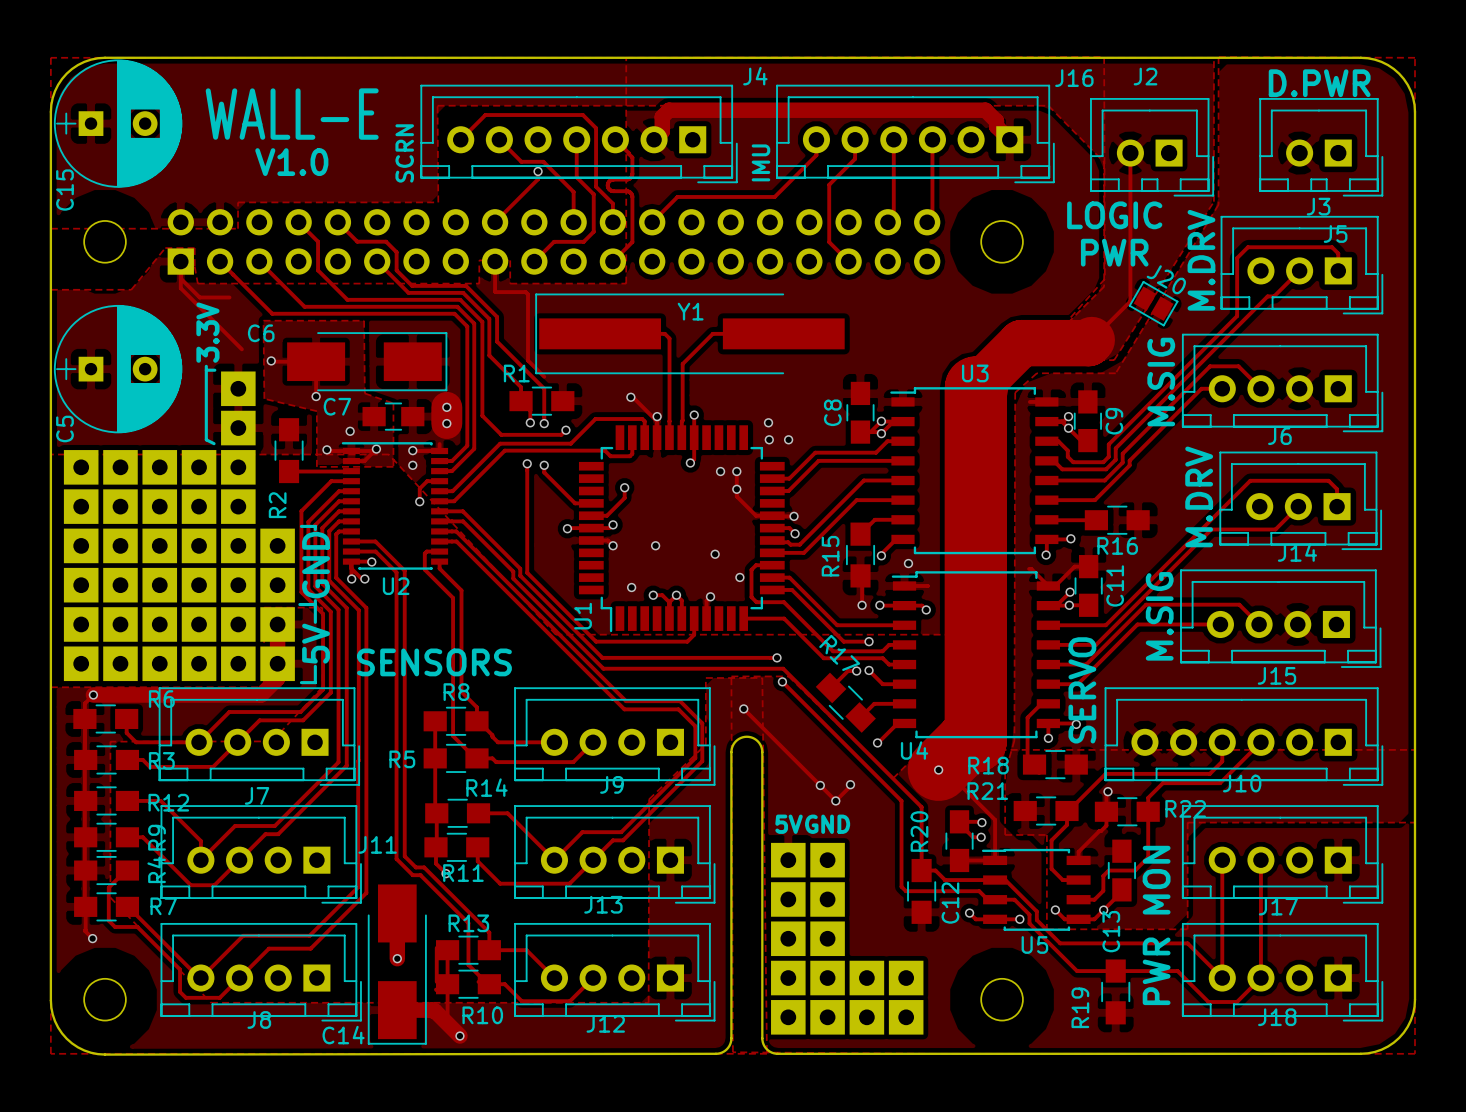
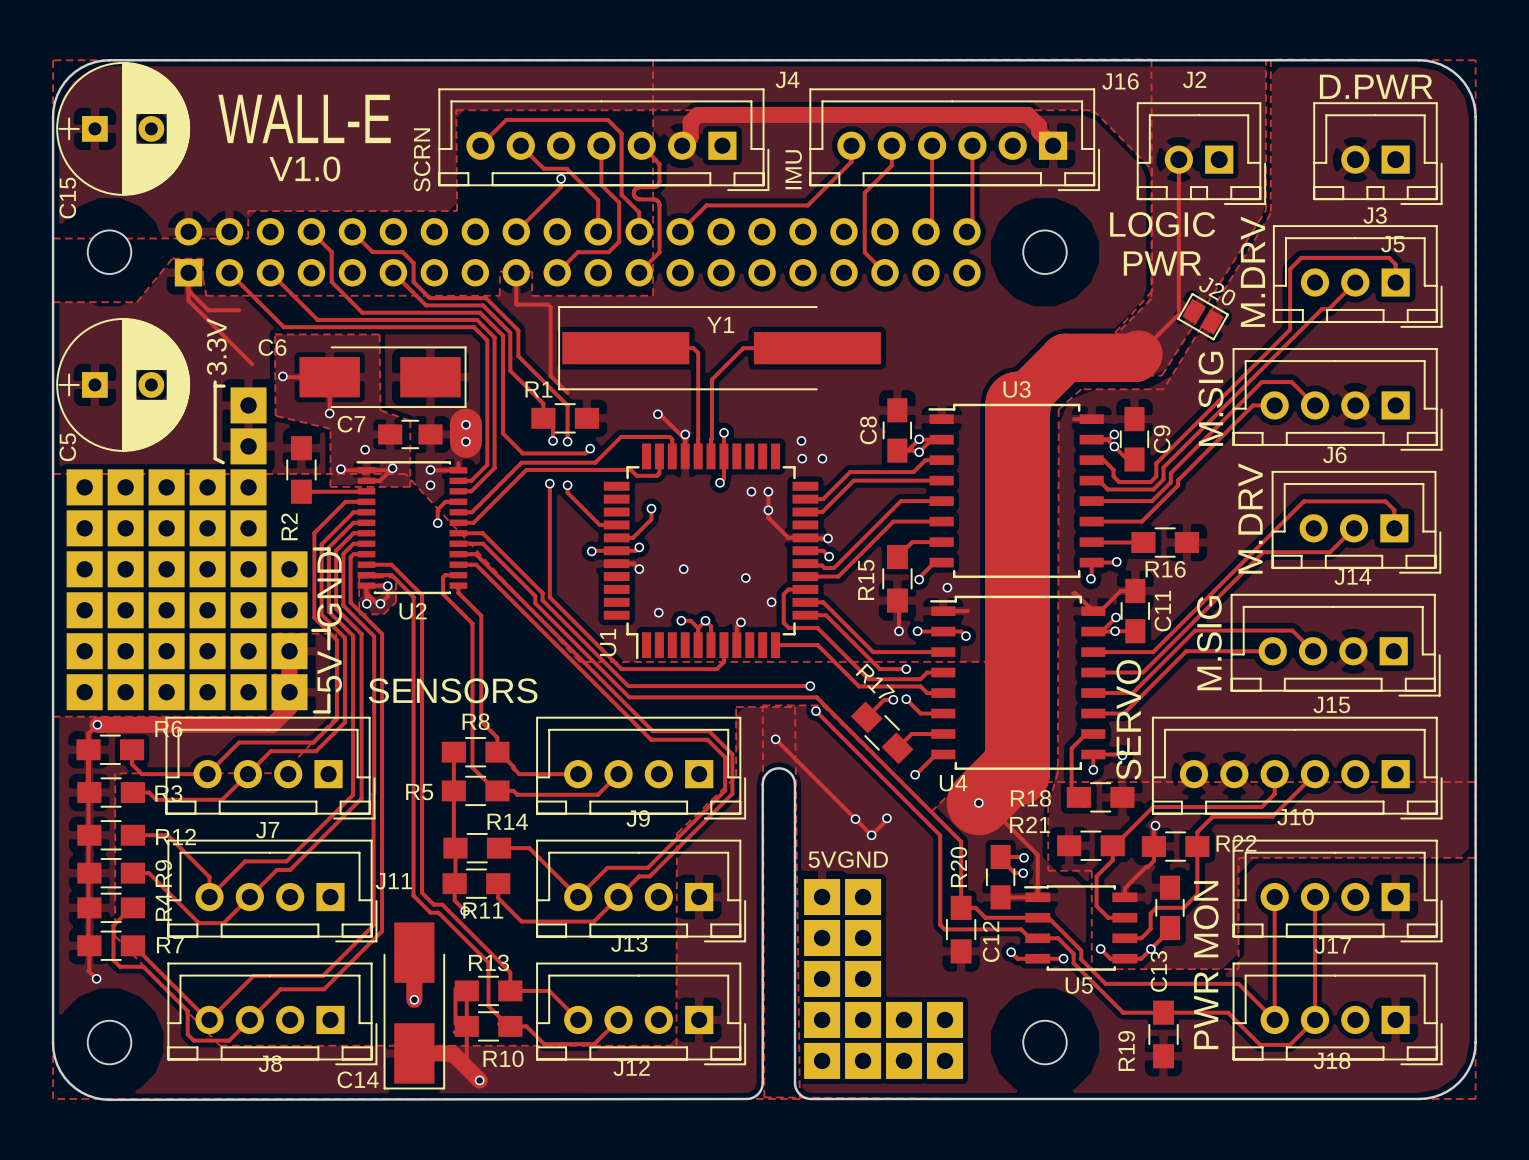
zone outline: none -> (359, 577) (359, 614) (383, 614) (396, 602) (396, 577) (359, 577)
track: none -> (387, 586) (387, 596) (380, 603)

